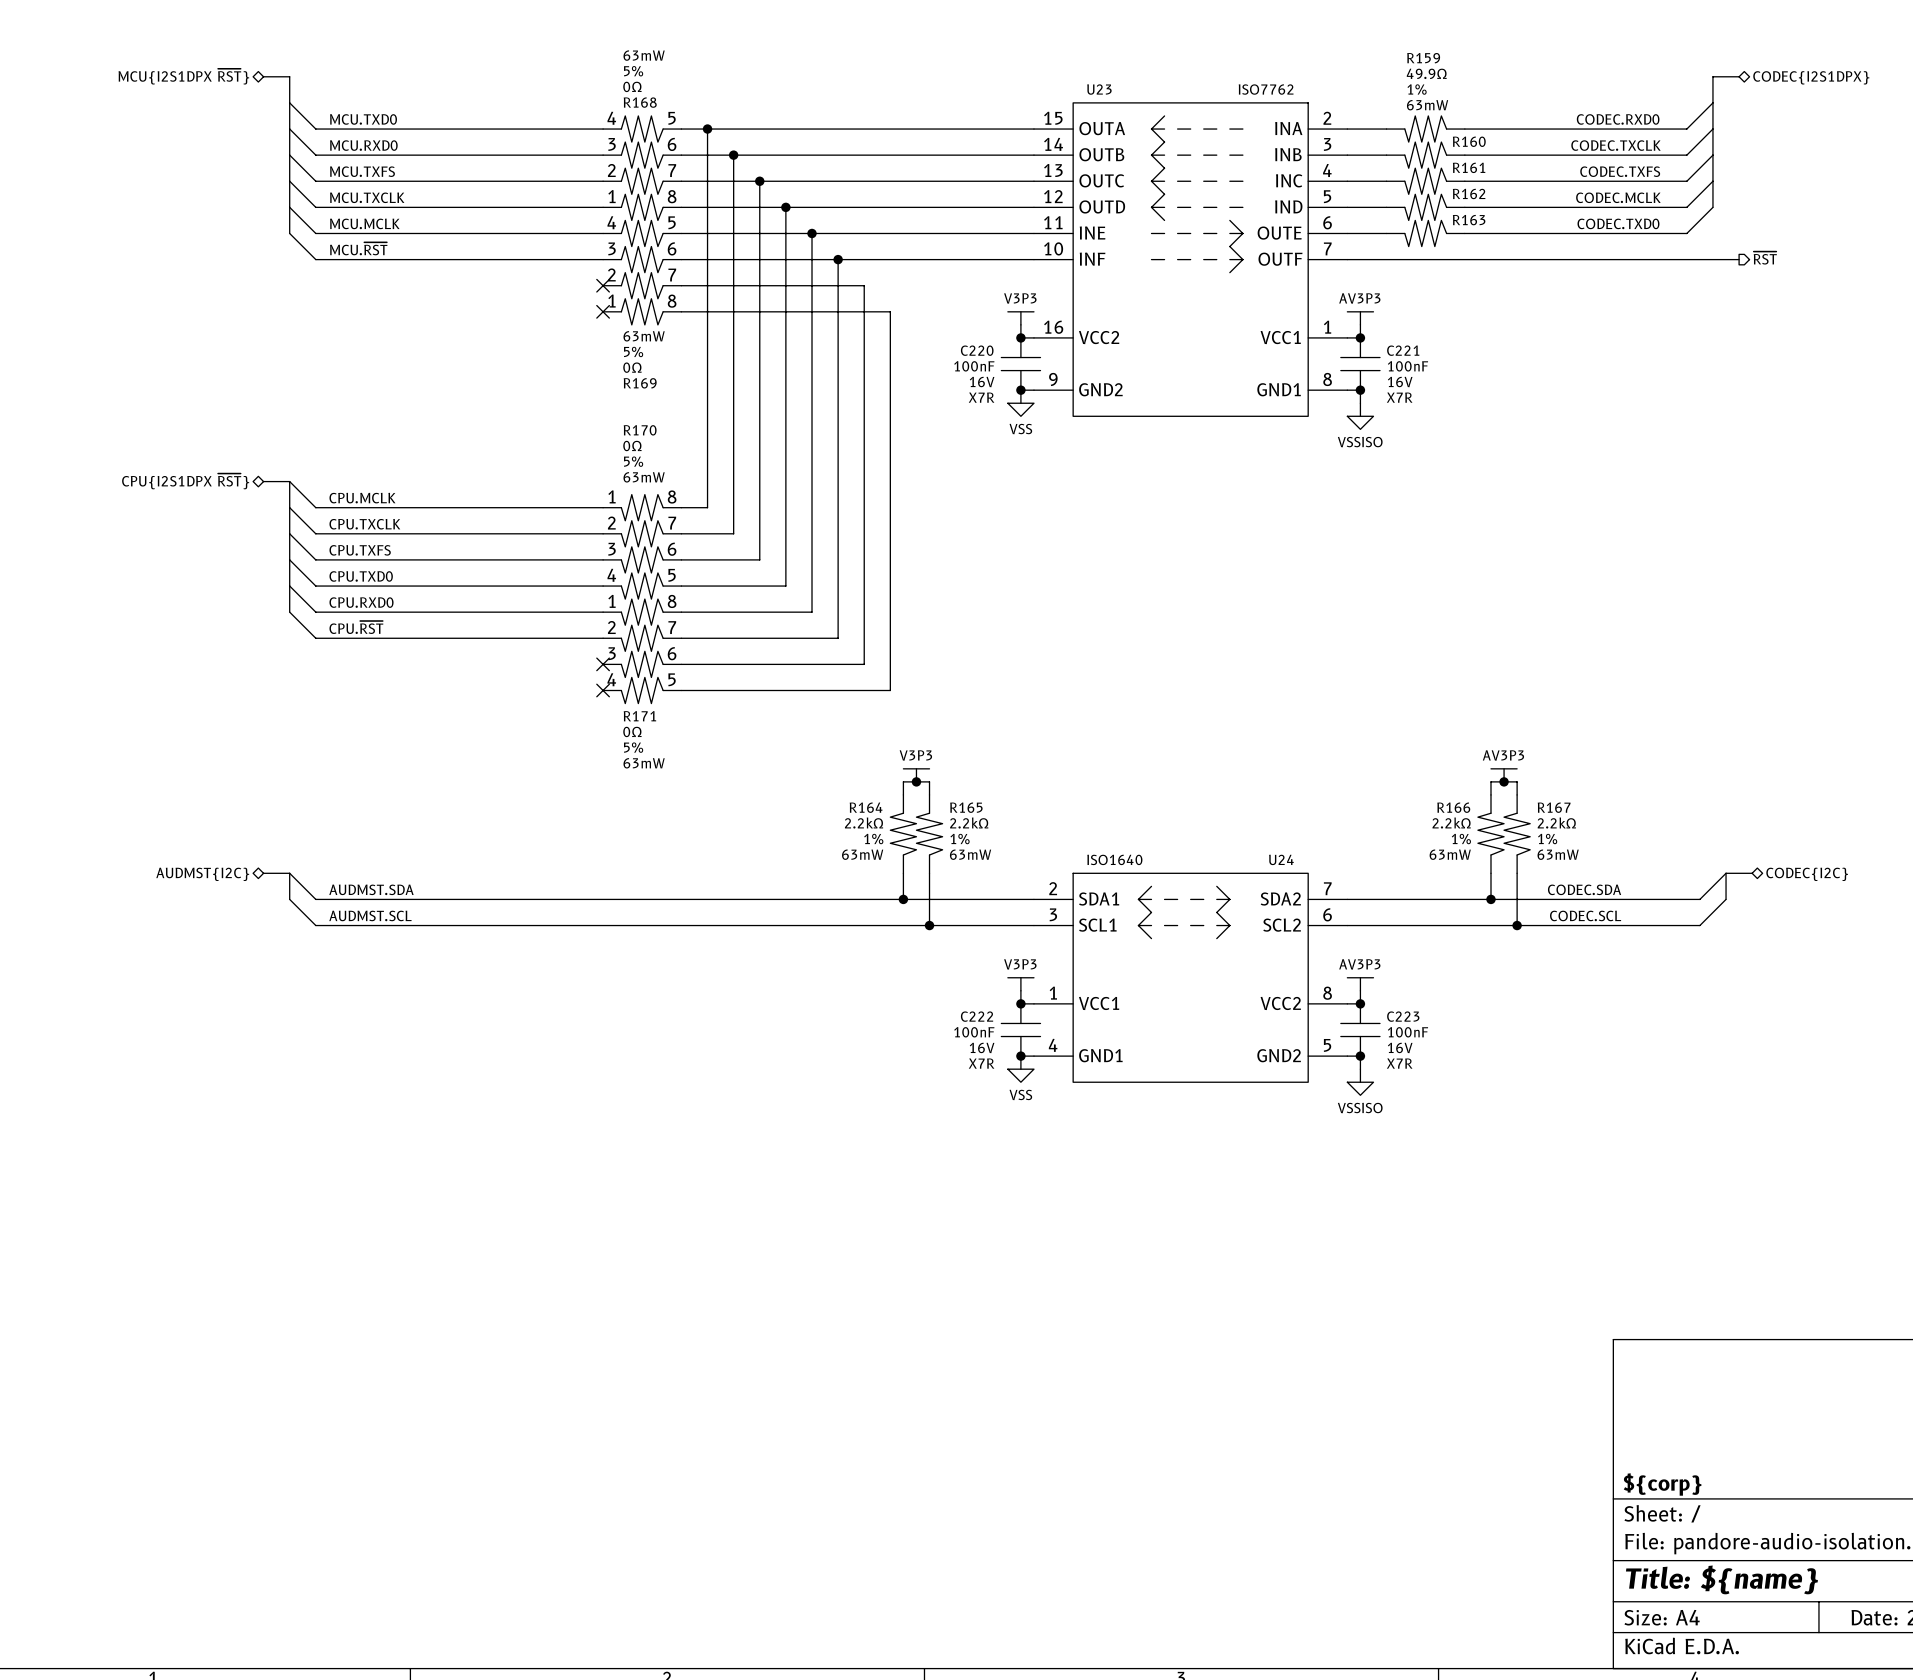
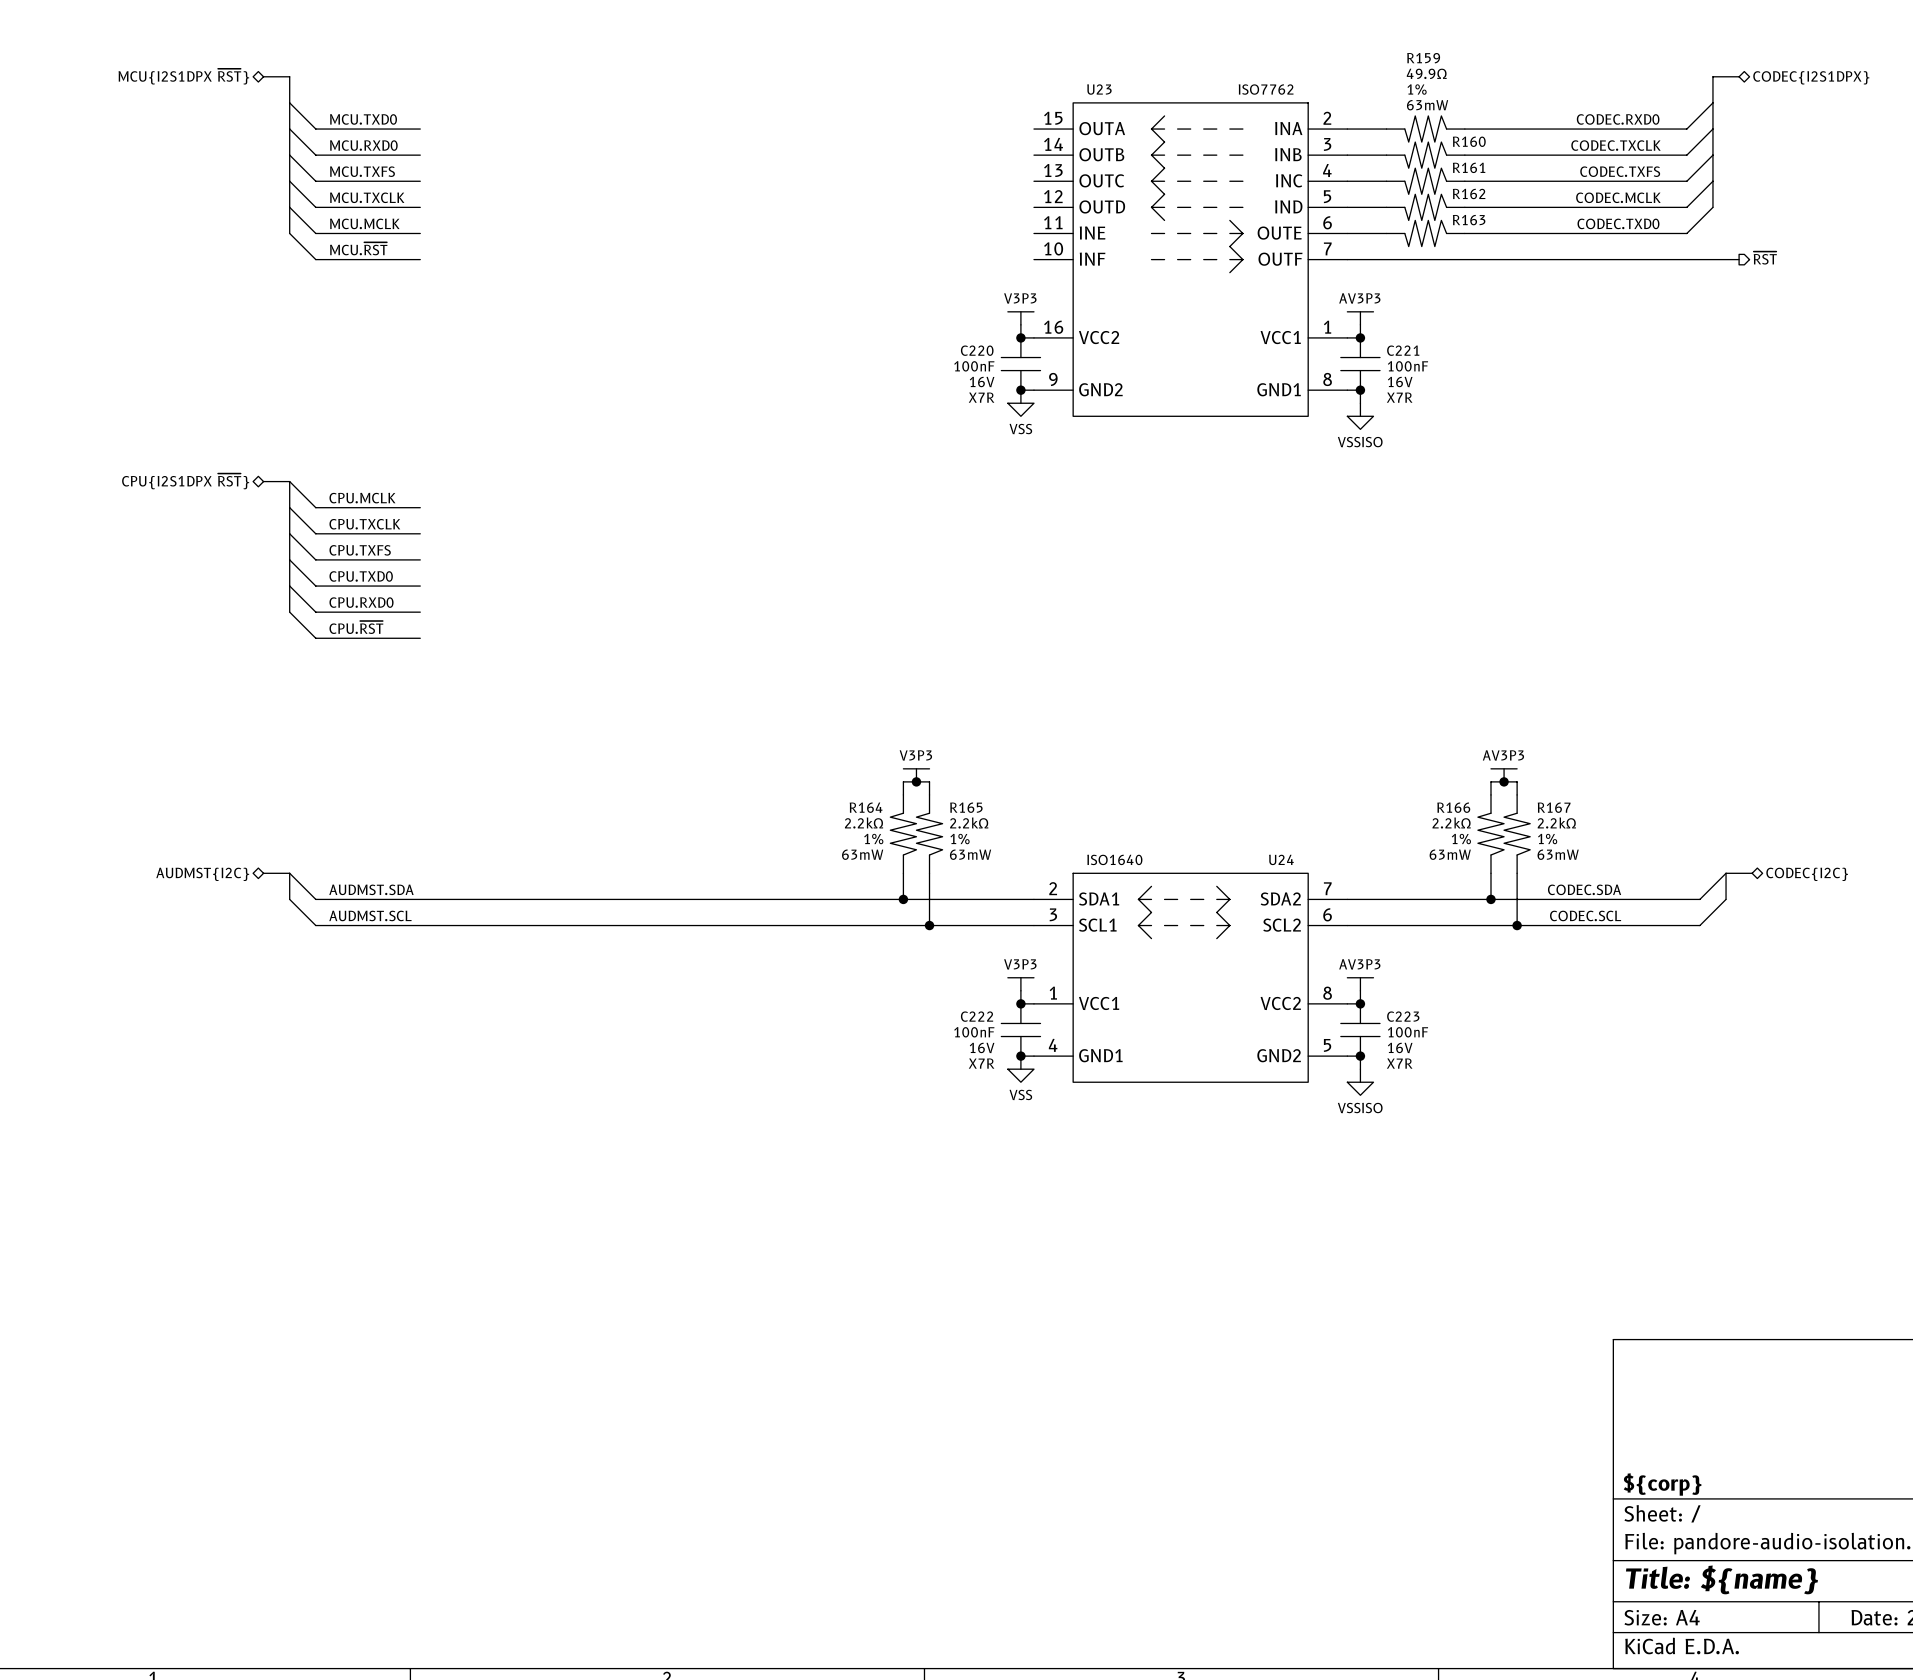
wire: (420, 129) (603, 129) -> none
wire: (681, 129) (1033, 129) -> none
wire: (707, 129) (707, 507) (681, 507) -> none
junction: (707, 129) -> none
wire: (420, 155) (603, 155) -> none
wire: (681, 155) (1033, 155) -> none
wire: (733, 155) (733, 533) (681, 533) -> none
junction: (733, 155) -> none
R168: (642, 168) -> none
wire: (420, 181) (603, 181) -> none
wire: (681, 181) (1033, 181) -> none
wire: (759, 181) (759, 559) (681, 559) -> none
junction: (759, 181) -> none
wire: (420, 207) (603, 207) -> none
wire: (681, 207) (1033, 207) -> none
wire: (785, 207) (785, 586) (681, 586) -> none
junction: (785, 207) -> none
wire: (420, 233) (603, 233) -> none
wire: (681, 233) (1033, 233) -> none
wire: (812, 233) (812, 612) (681, 612) -> none
junction: (812, 233) -> none
wire: (420, 259) (603, 259) -> none
wire: (681, 259) (1033, 259) -> none
wire: (838, 259) (838, 638) (681, 638) -> none
junction: (838, 259) -> none
R169: (642, 272) -> none
no-connect mark: (603, 285) -> none
wire: (681, 285) (864, 285) (864, 664) (681, 664) -> none
no-connect mark: (603, 311) -> none
wire: (681, 311) (890, 311) (890, 690) (681, 690) -> none
wire: (420, 507) (603, 507) -> none
wire: (420, 533) (603, 533) -> none
R170: (642, 546) -> none
wire: (420, 559) (603, 559) -> none
wire: (420, 586) (603, 586) -> none
wire: (420, 612) (603, 612) -> none
wire: (420, 638) (603, 638) -> none
R171: (642, 651) -> none
no-connect mark: (603, 664) -> none
no-connect mark: (603, 690) -> none

